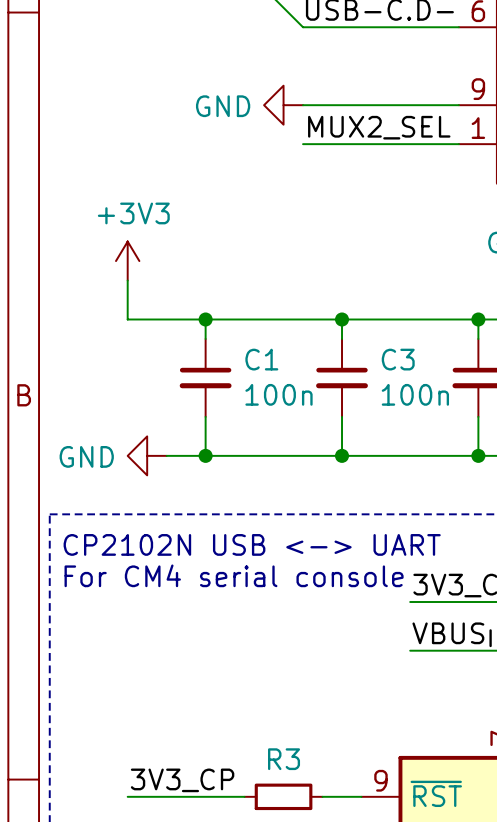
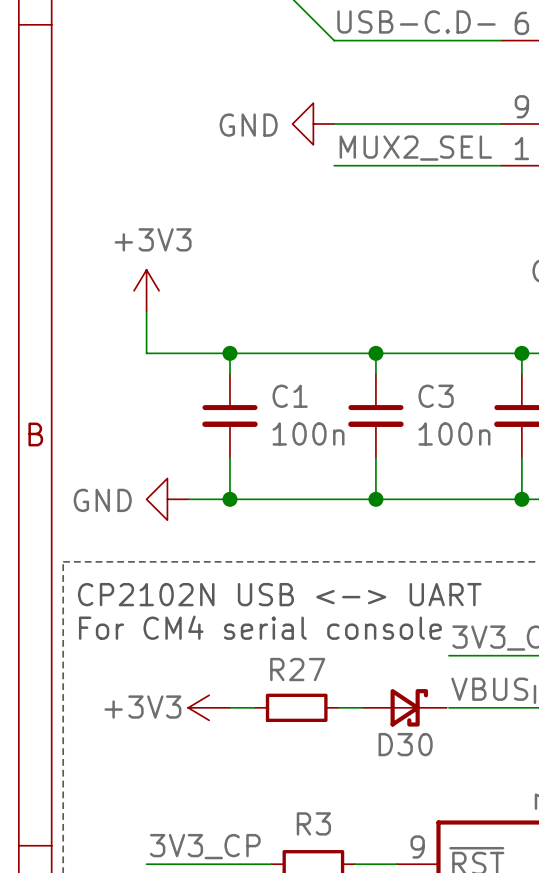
power symbol: none -> +3V3 (209, 707)
wire: none -> (229, 707) (255, 707)
R27: none -> (296, 707)
wire: none -> (338, 707) (363, 707)
D30: none -> (405, 707)

